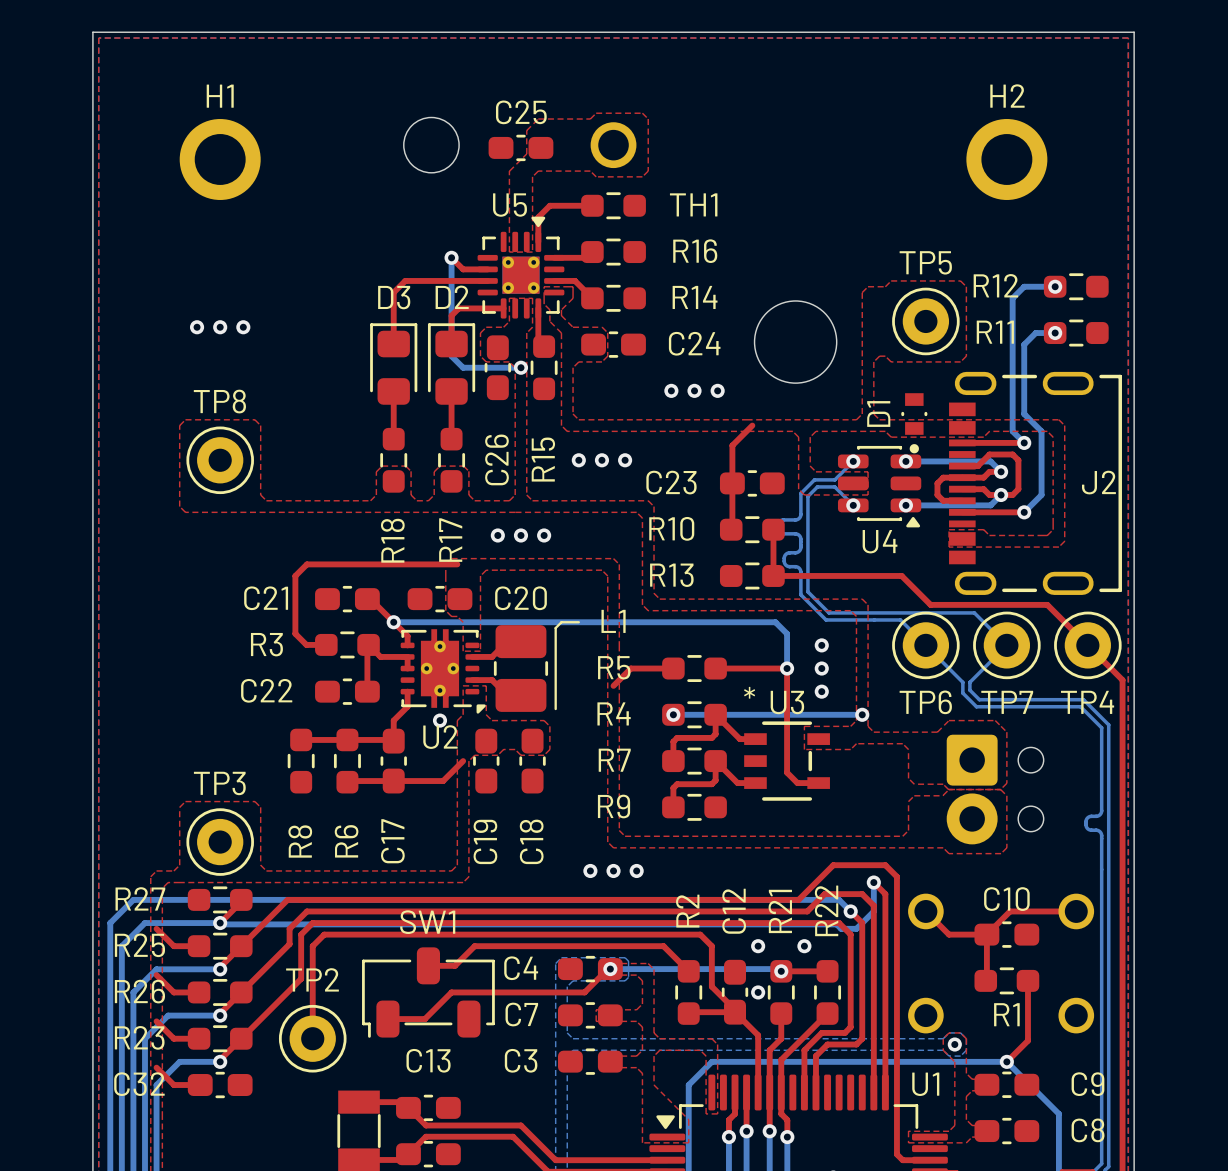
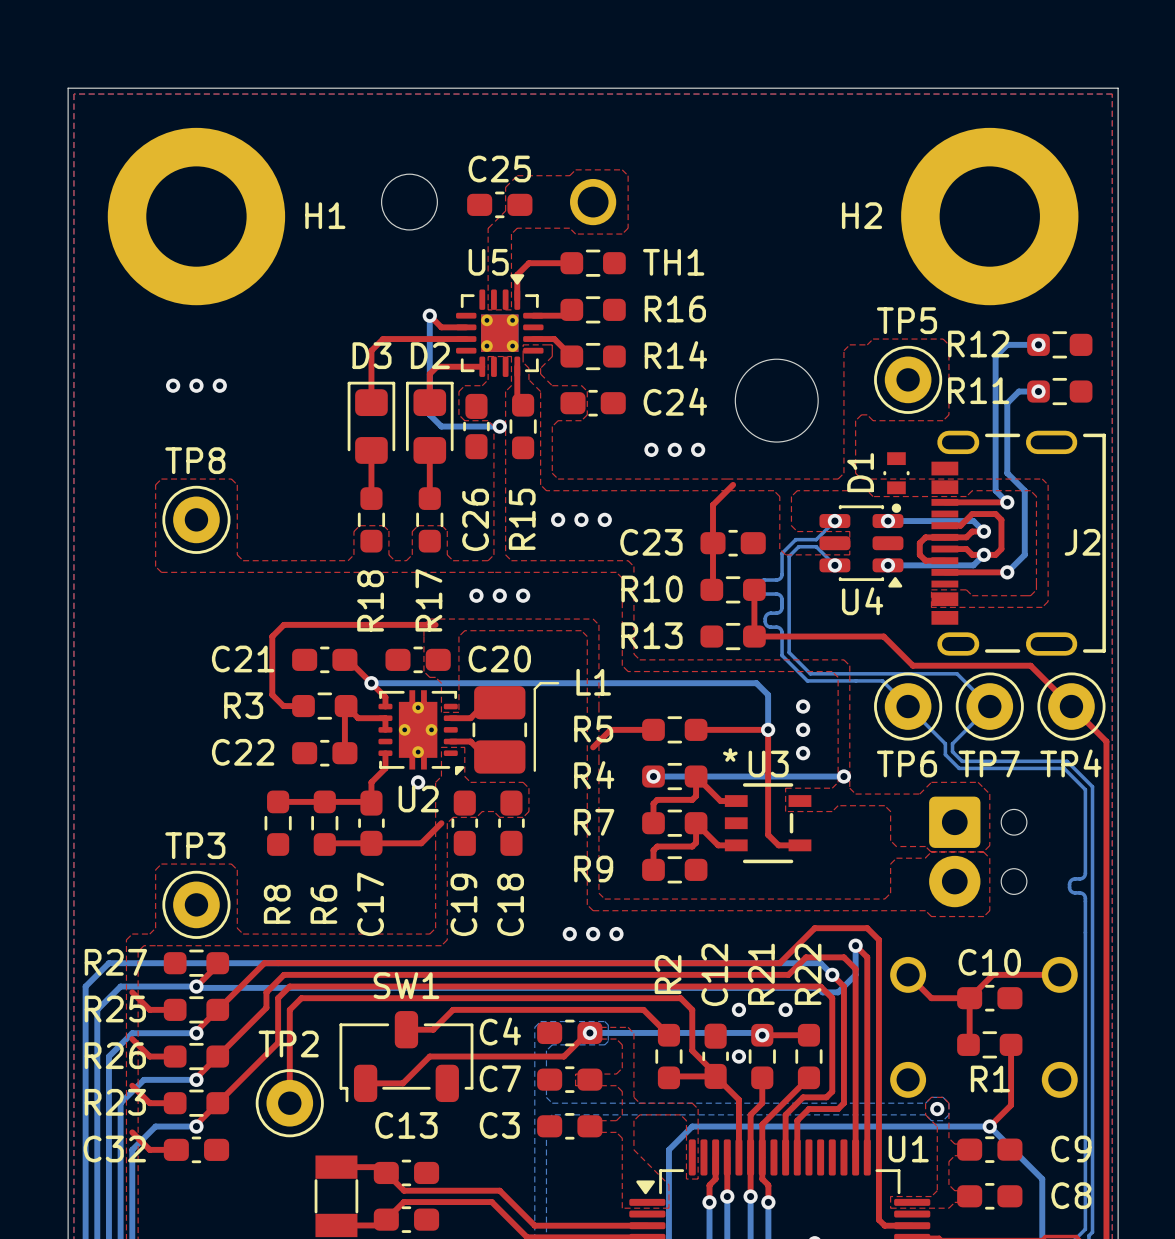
H1 name position: H1 (220, 96) -> H1 (325, 215)
H2 name position: H2 (1007, 96) -> H2 (862, 215)
H1 footprint: [179, 119, 261, 200] -> [107, 127, 286, 306]
H2 footprint: [966, 119, 1048, 200] -> [901, 127, 1079, 306]

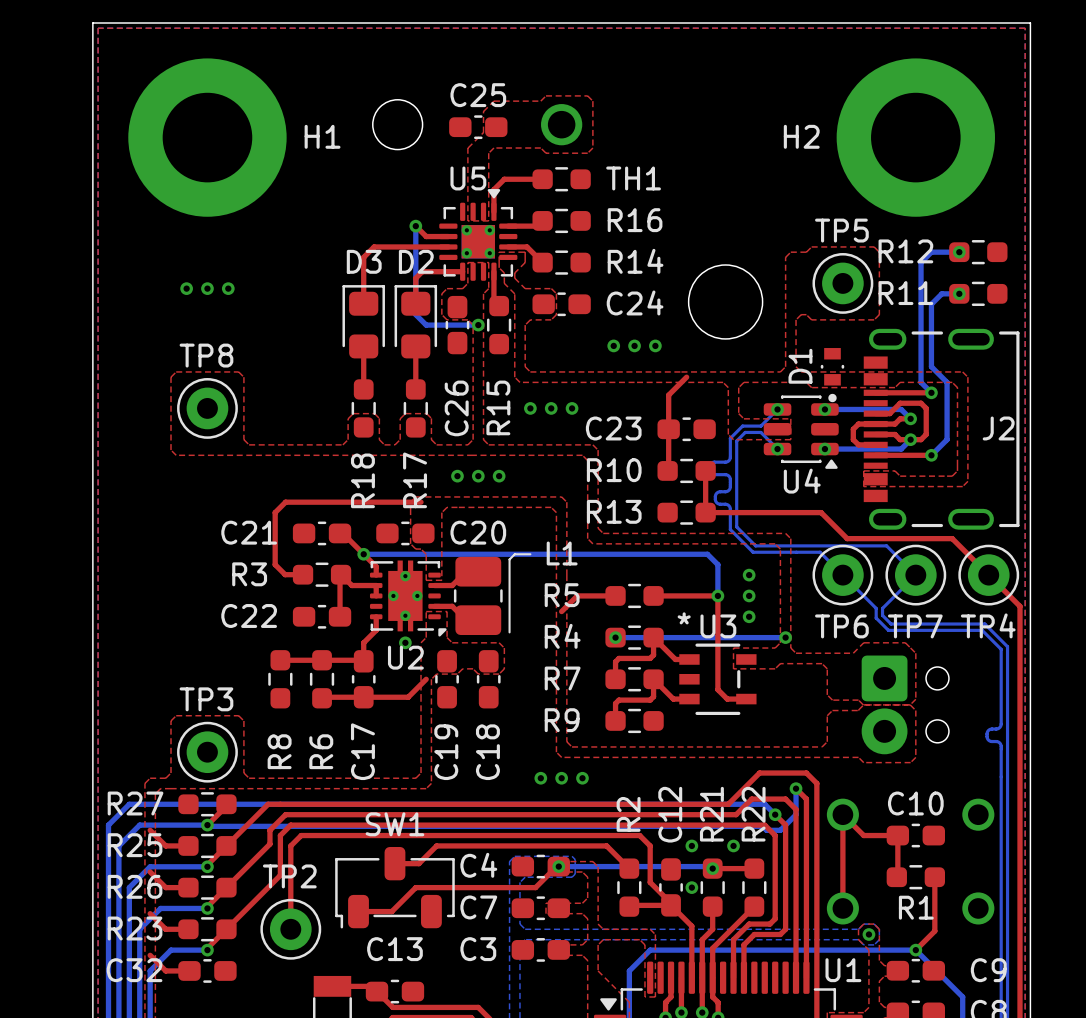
top track: none -> (842, 814) (842, 908)
top track: (1059, 974) (992, 974) (969, 998) -> none

